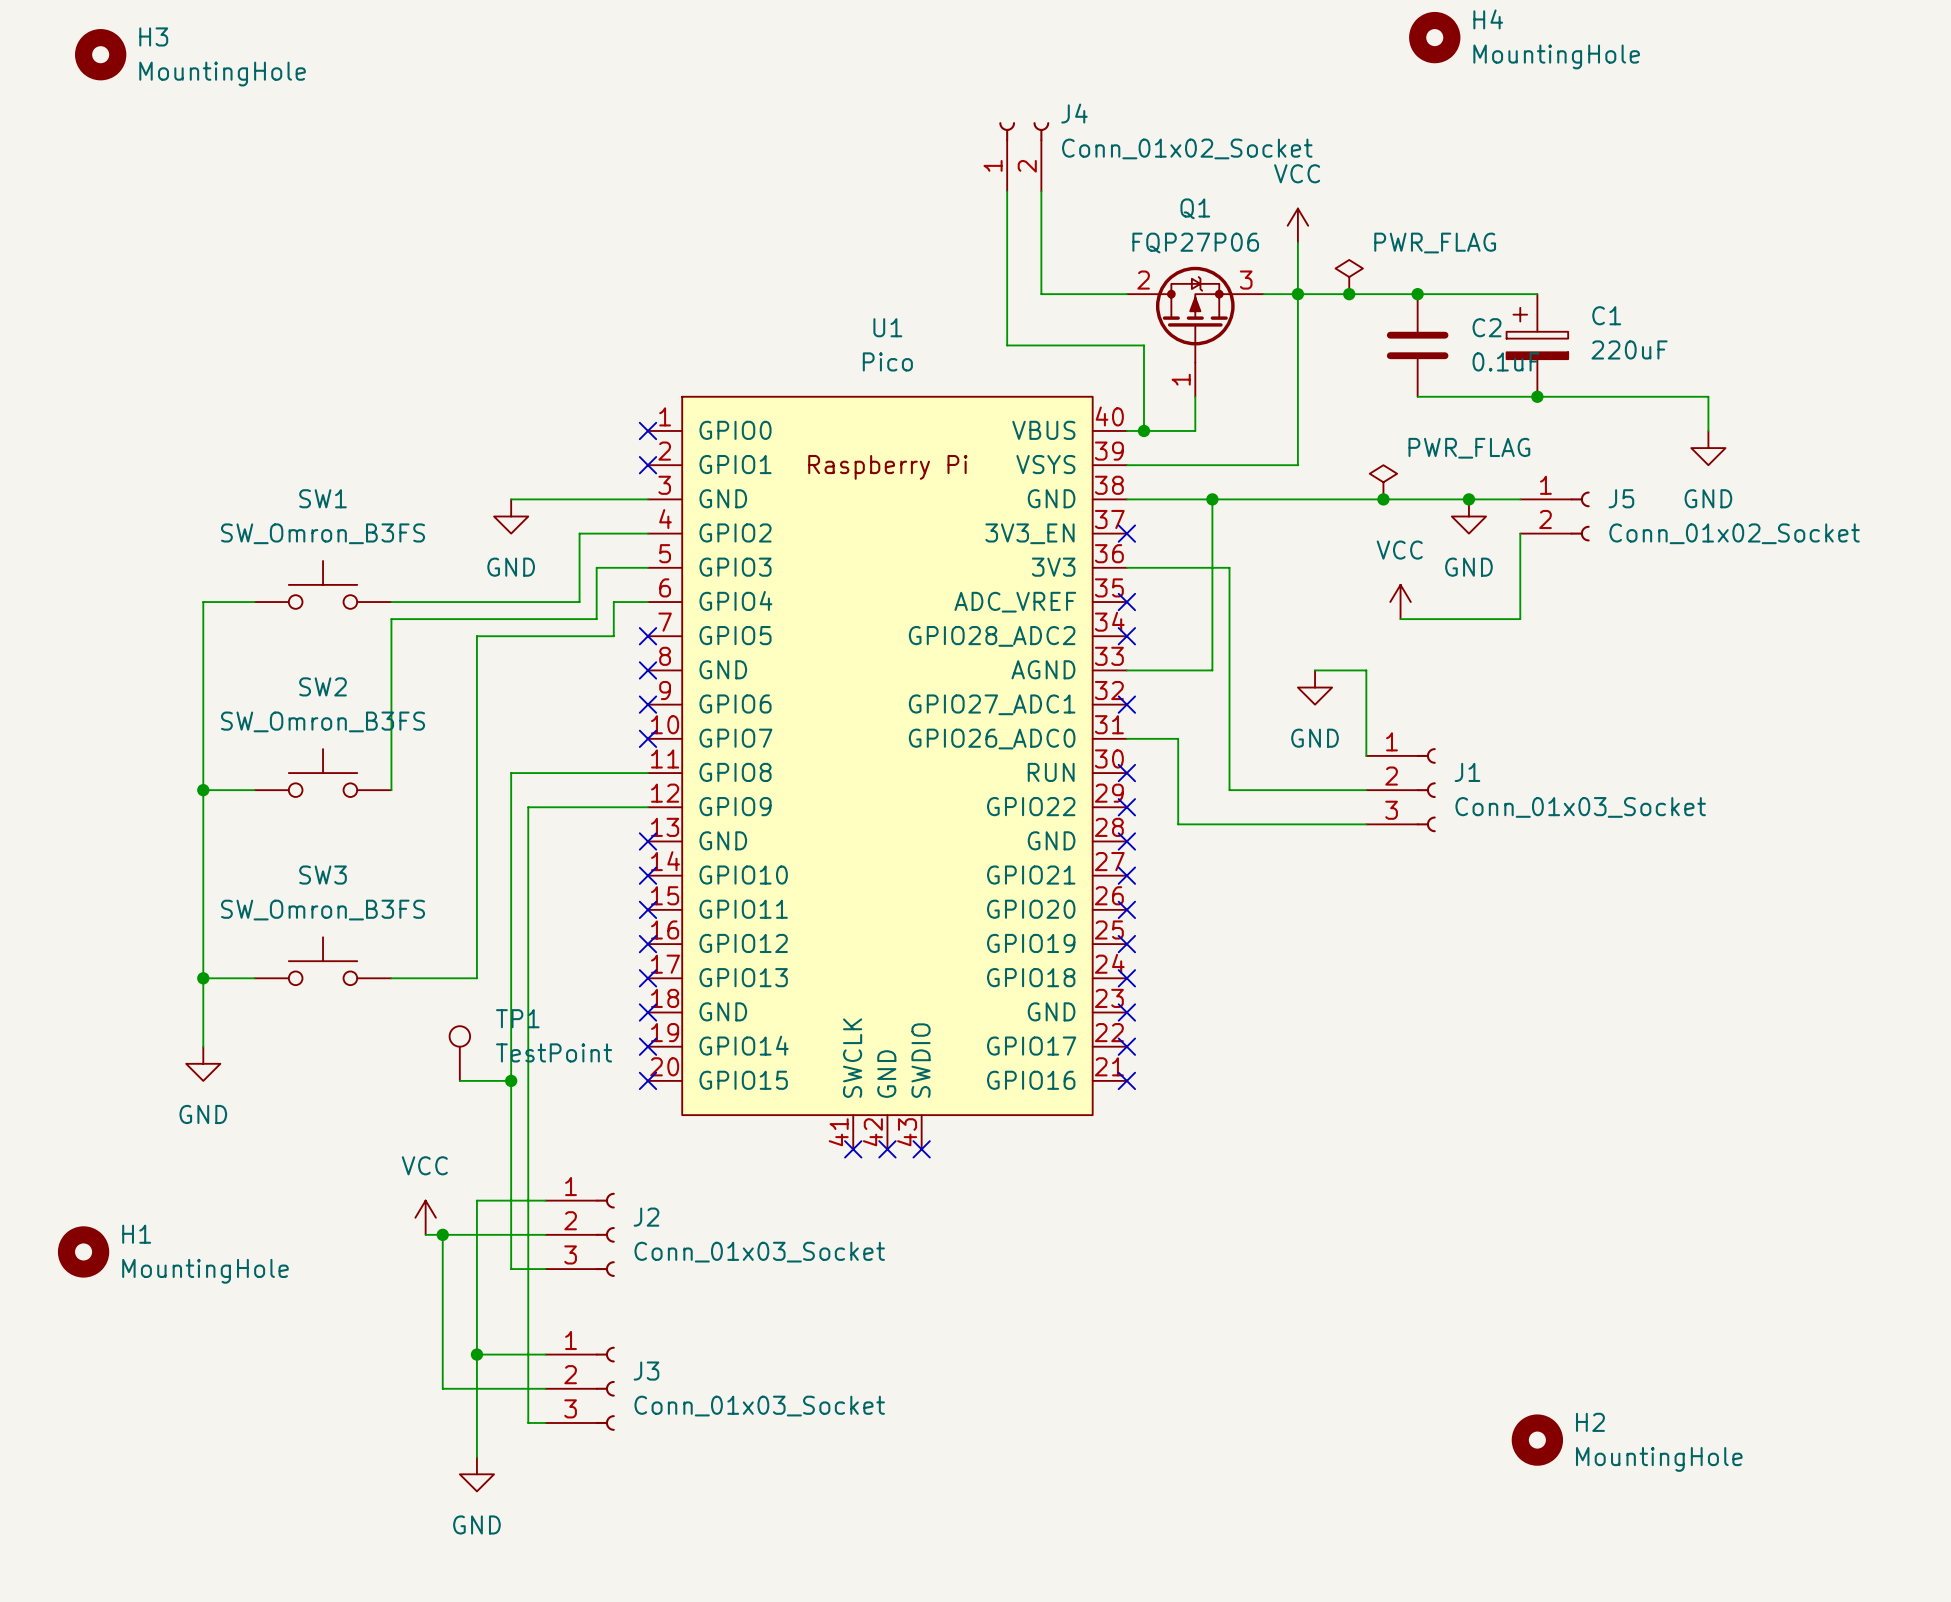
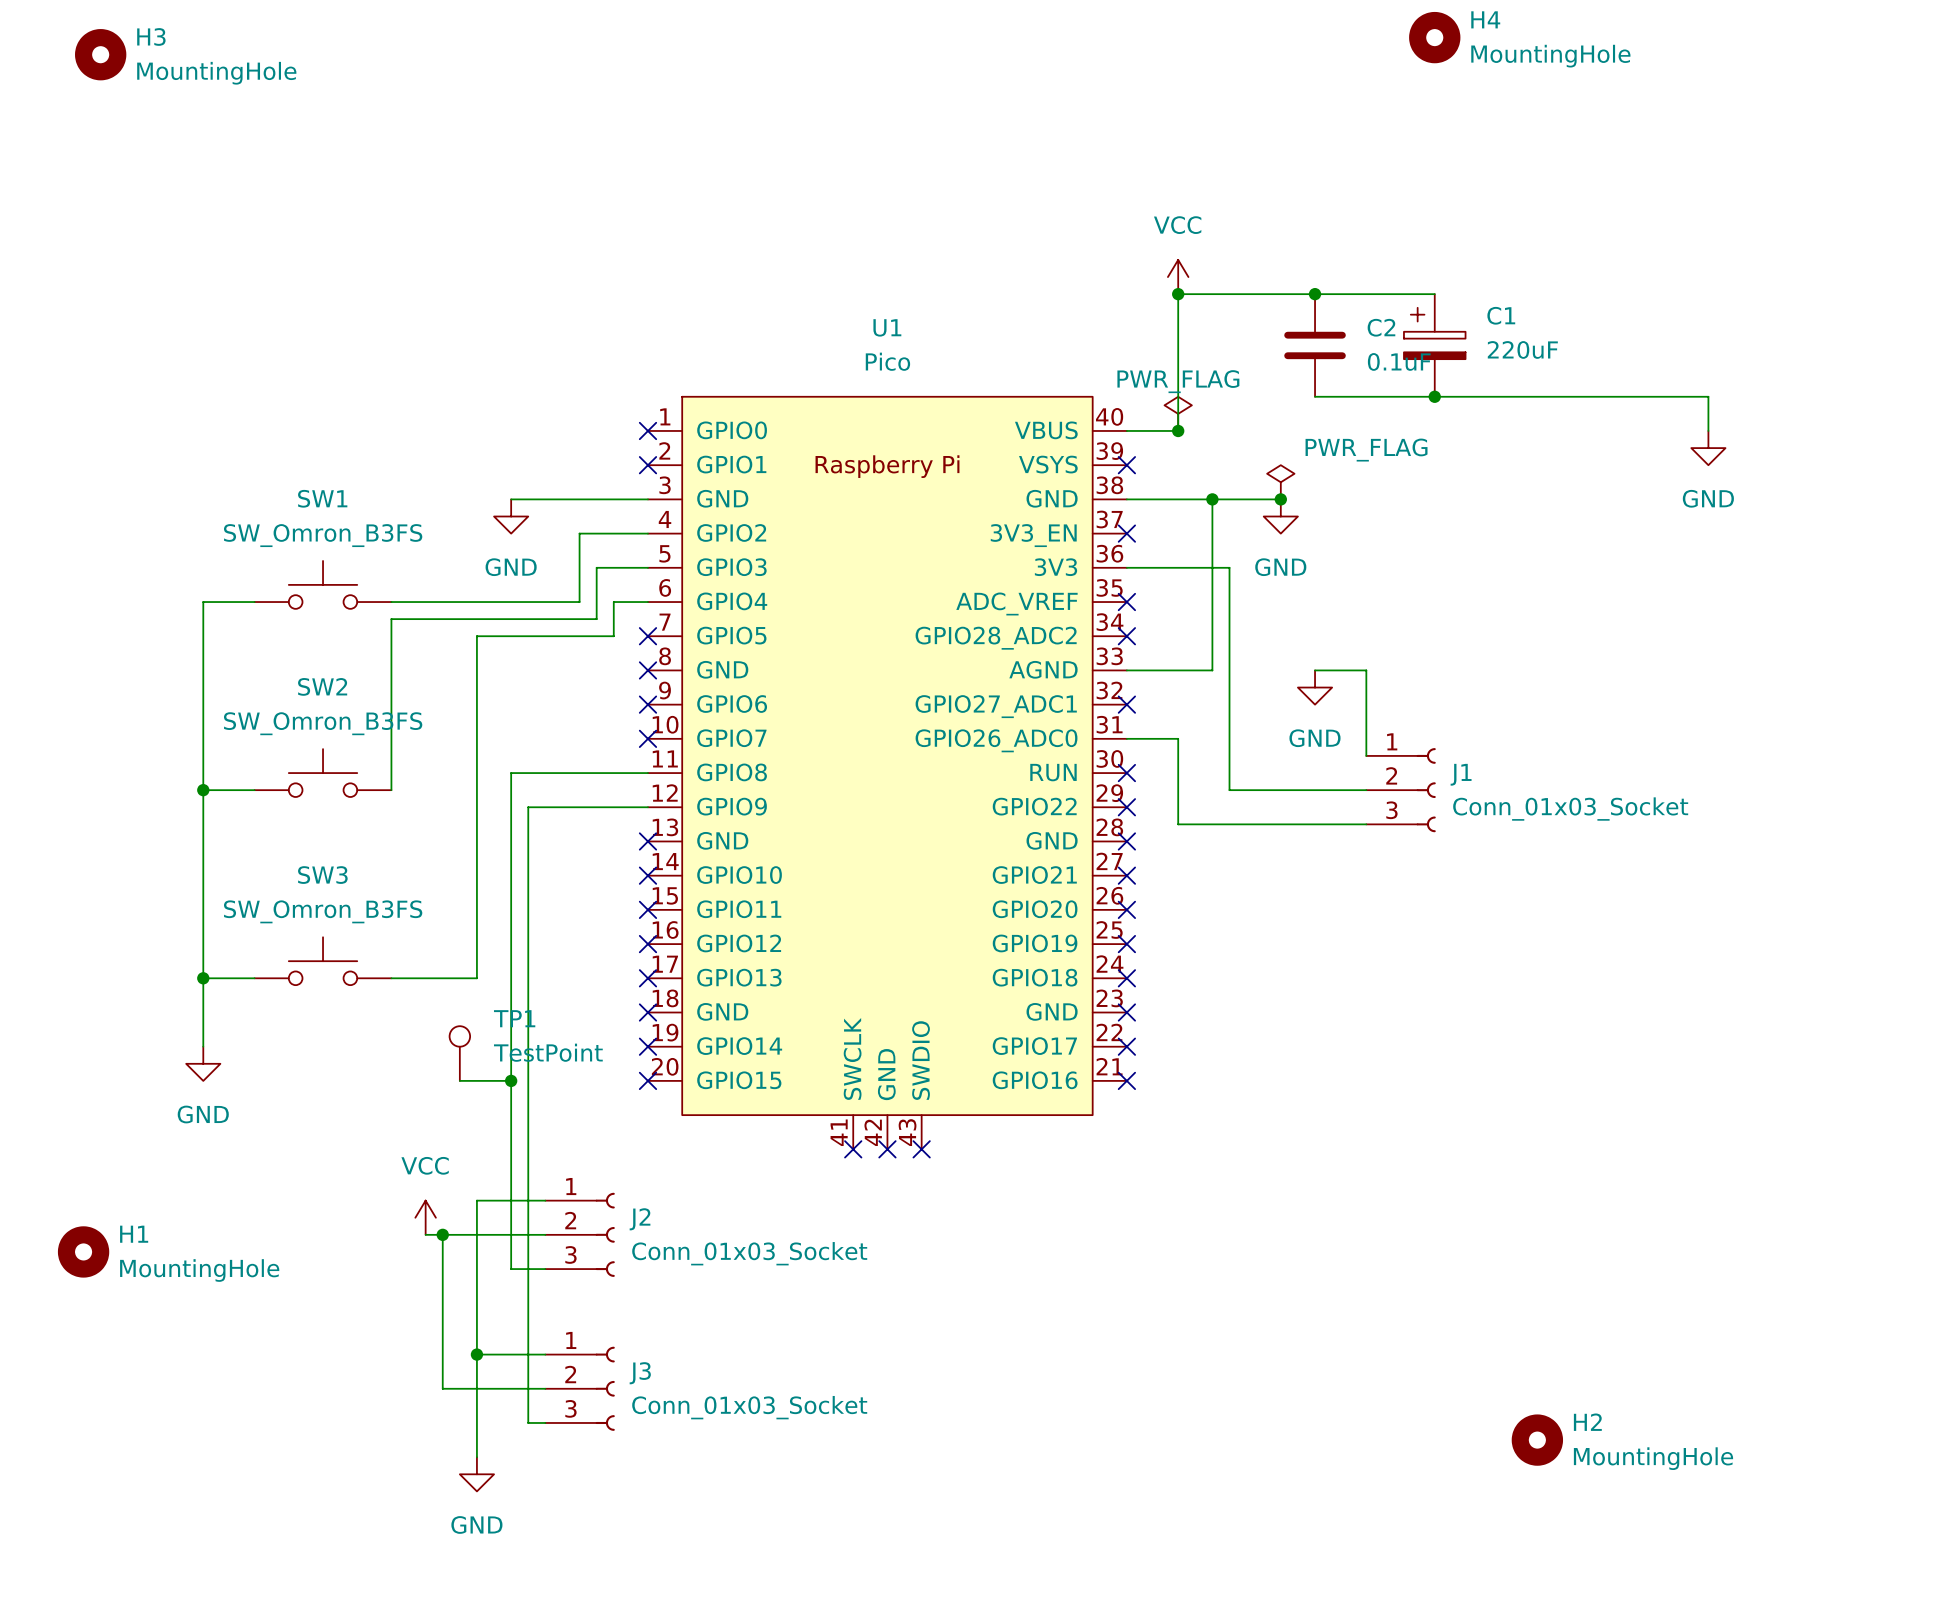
J4: Conn_01x02_Socket (1024, 156) -> none
wire: (1007, 191) (1007, 345) (1143, 345) (1143, 430) -> none
wire: (1041, 191) (1041, 294) (1126, 294) -> none
power symbol position: VCC (1297, 225) -> VCC (1178, 277)
wire: (1297, 242) (1297, 465) (1126, 465) -> none
power symbol: PWR_FLAG (1349, 277) -> none
junction: none -> (1178, 294)
junction: (1297, 294) -> none
junction: none -> (1315, 294)
junction: (1349, 294) -> none
junction: (1417, 294) -> none
wire: (1434, 294) (1537, 294) -> (1315, 396) (1417, 396)
Q1: FQP27P06 (1195, 331) -> none
C2 position: (1417, 345) -> (1315, 345)
C1 position: (1537, 345) -> (1434, 345)
wire: (1195, 396) (1195, 430) (1178, 430) -> (1263, 294) (1178, 294) (1178, 430)
junction: none -> (1434, 396)
junction: (1537, 396) -> none
power symbol: none -> PWR_FLAG (1178, 413)
junction position: (1143, 430) -> (1178, 430)
no-connect mark: none -> (1126, 465)
power symbol position: PWR_FLAG (1383, 482) -> PWR_FLAG (1280, 482)
wire: (1280, 499) (1520, 499) -> none
junction: none -> (1280, 499)
junction: (1383, 499) -> none
junction: (1468, 499) -> none
power symbol position: GND (1468, 516) -> GND (1280, 516)
J5: Conn_01x02_Socket (1554, 516) -> none
wire: (1520, 533) (1520, 619) (1400, 619) -> none
power symbol: VCC (1400, 602) -> none

